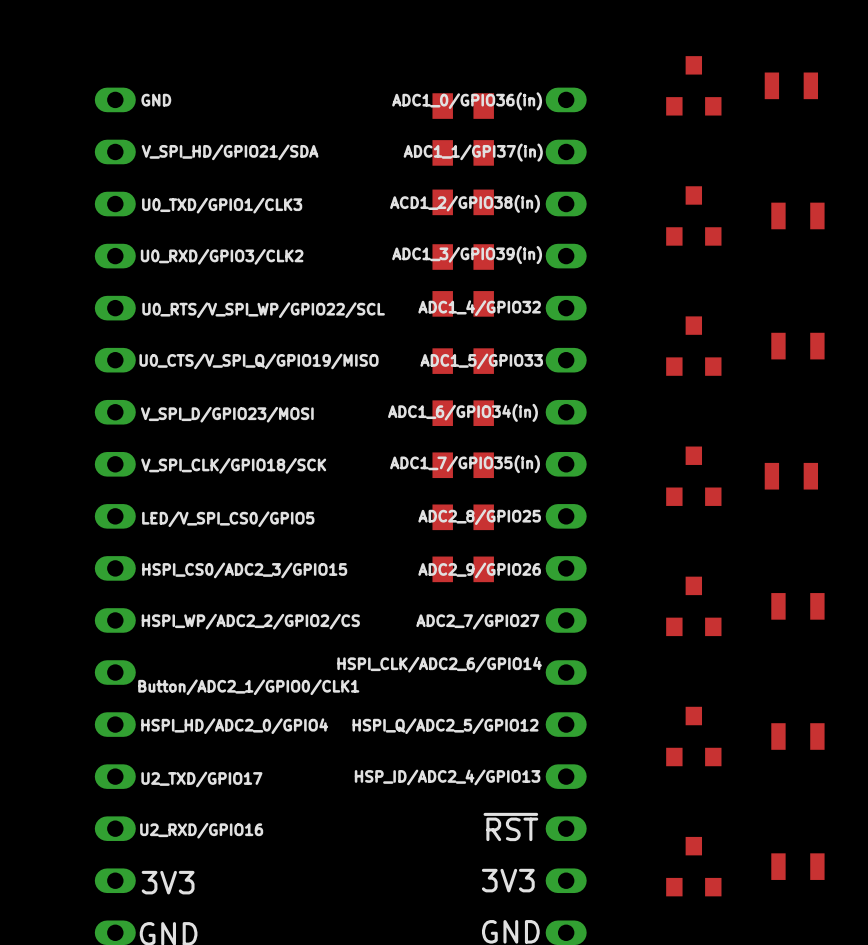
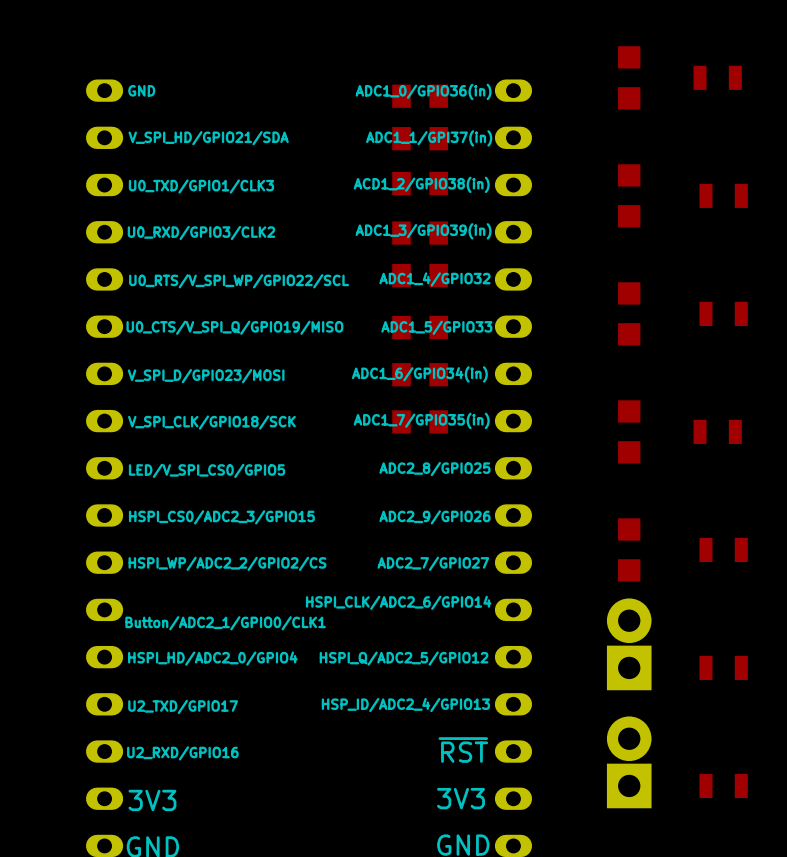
part footprint: [666, 56, 722, 116] -> [618, 46, 641, 110]
part footprint: [666, 186, 722, 246] -> [618, 164, 641, 228]
part footprint: [666, 316, 722, 376] -> [618, 282, 641, 346]
part footprint: [666, 446, 722, 506] -> [618, 400, 641, 464]
part: (463, 517) -> none
part: (463, 569) -> none
part footprint: [666, 576, 722, 637] -> [618, 518, 641, 582]
part: none -> (629, 644)
part: (693, 736) -> none
part: none -> (629, 762)
part: (693, 866) -> none

